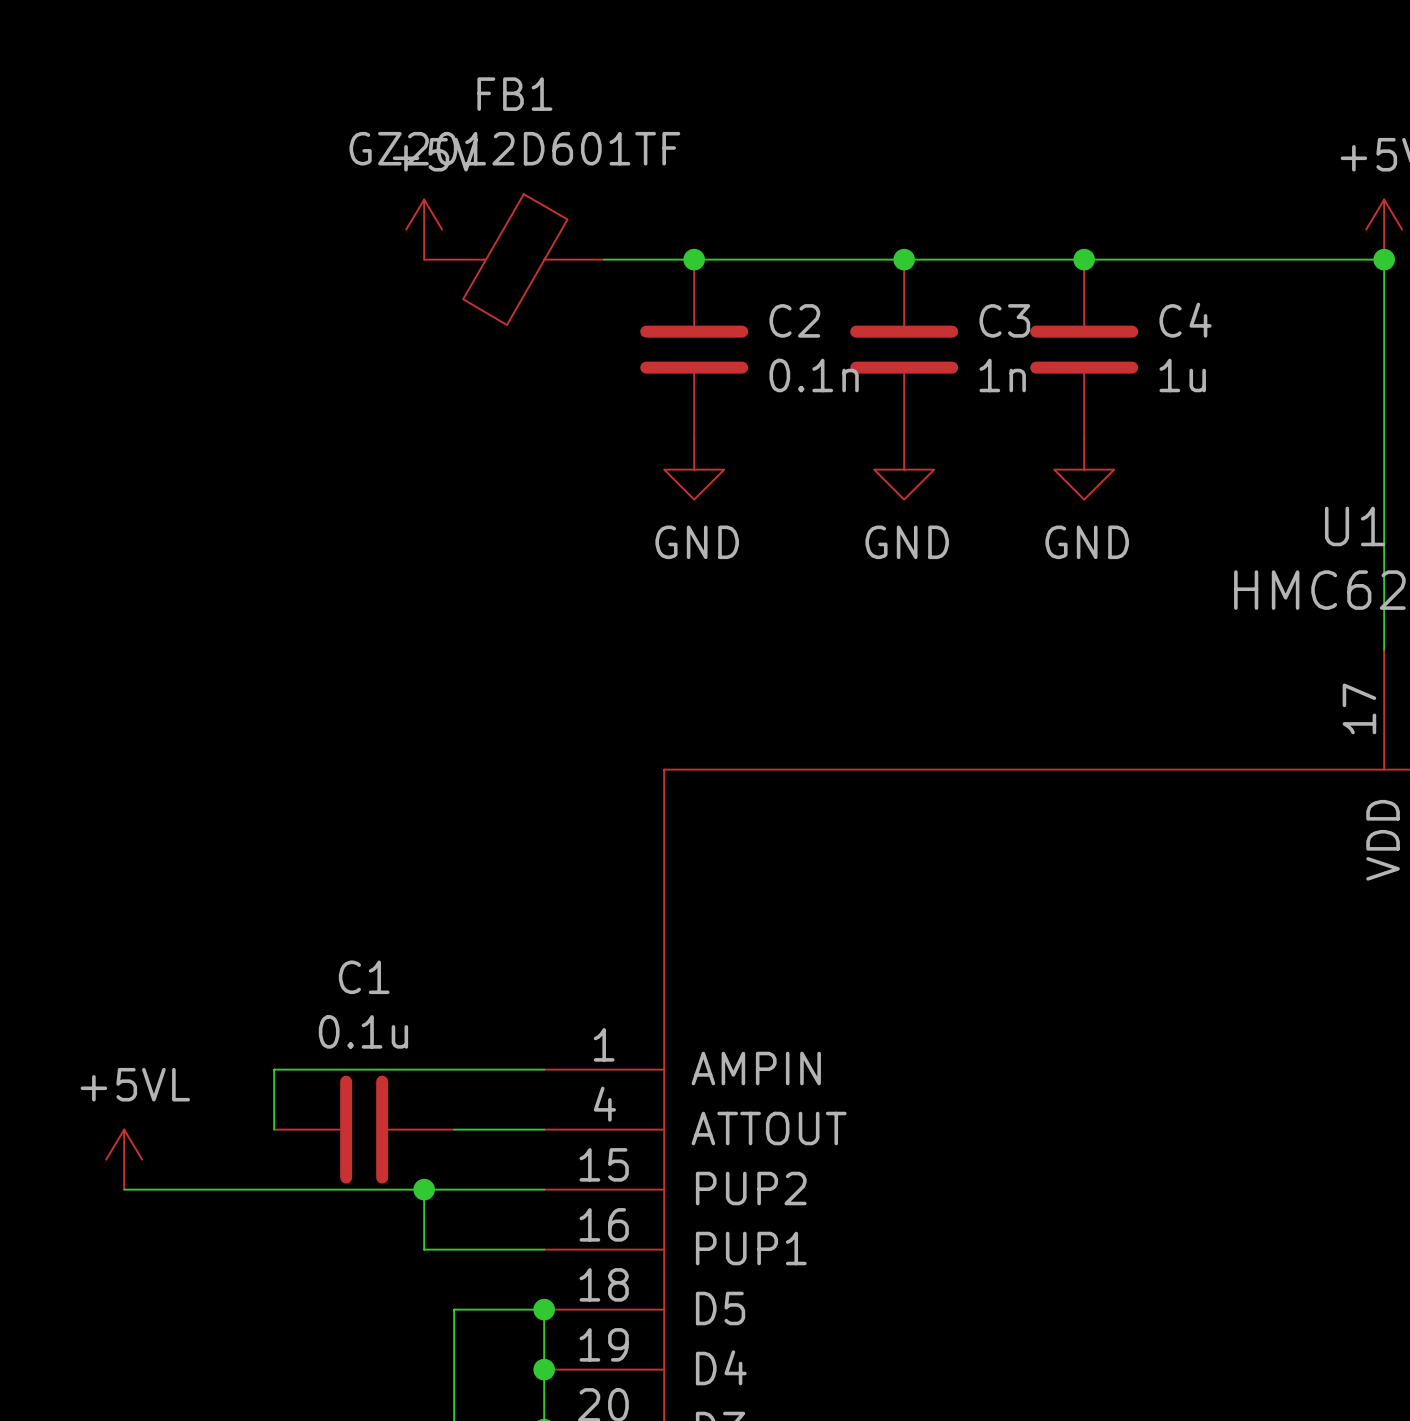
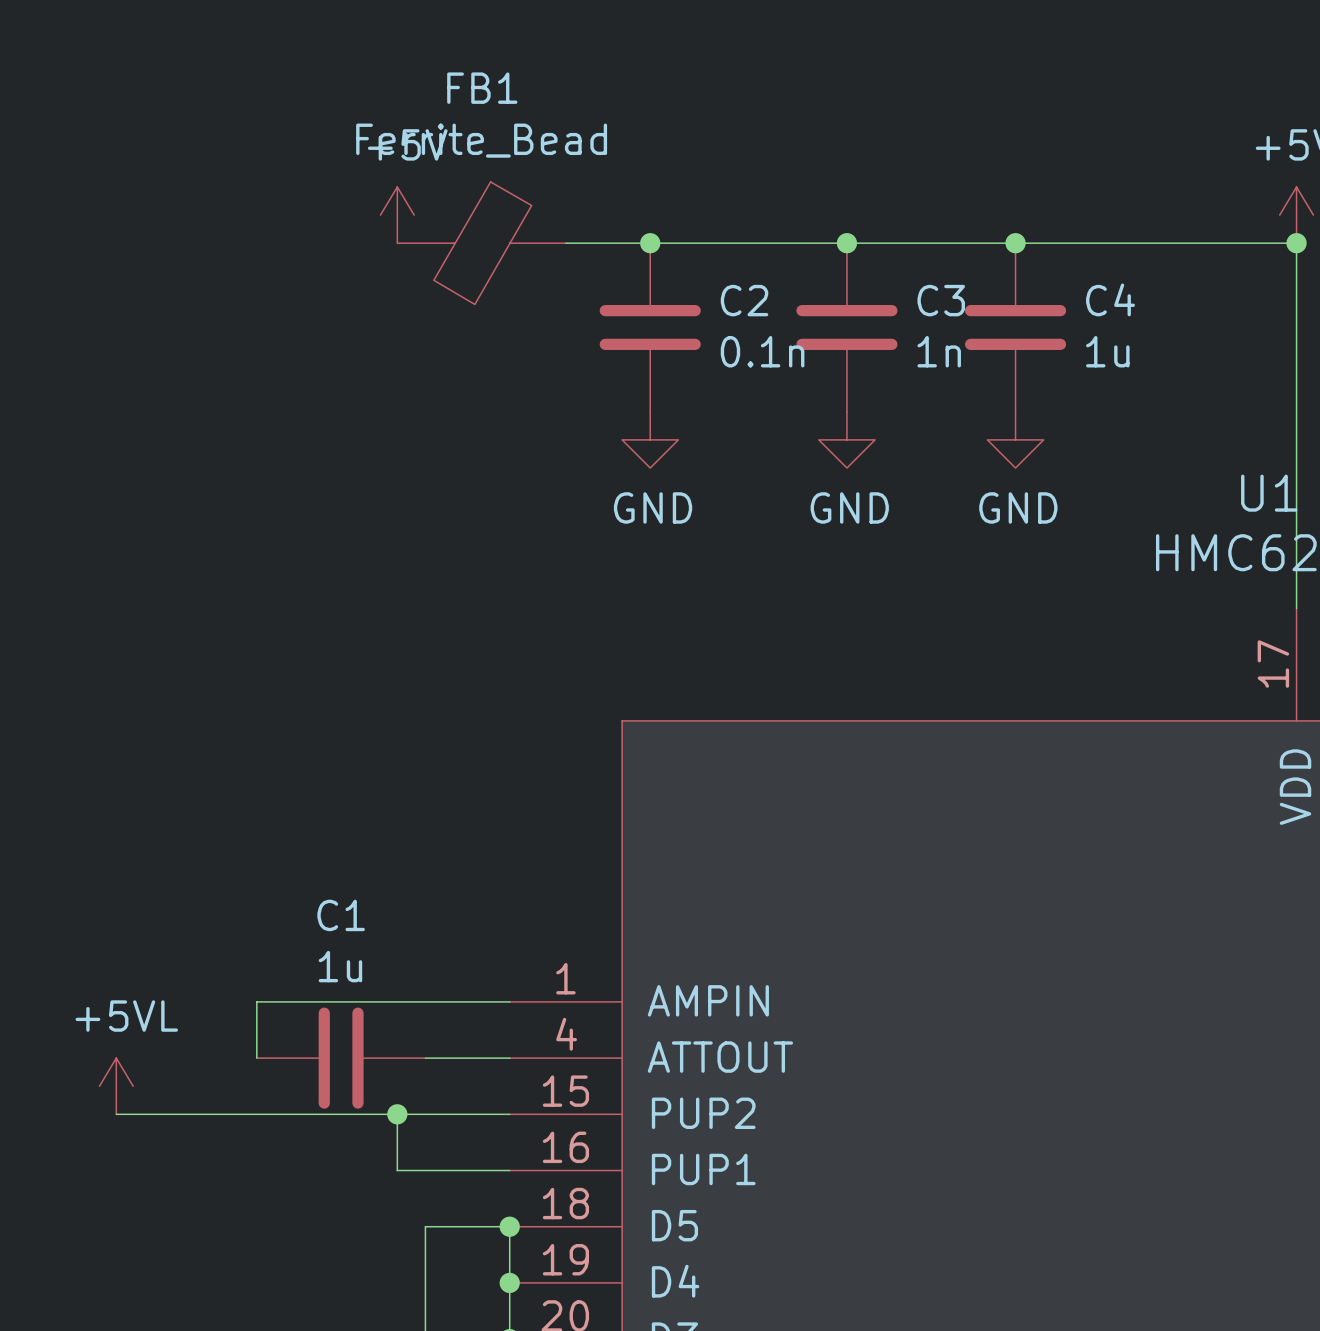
FB1 value: GZ2012D601TF (514, 148) -> Ferrite_Bead (481, 140)
C1 value: 0.1u (363, 1031) -> 1u (340, 966)

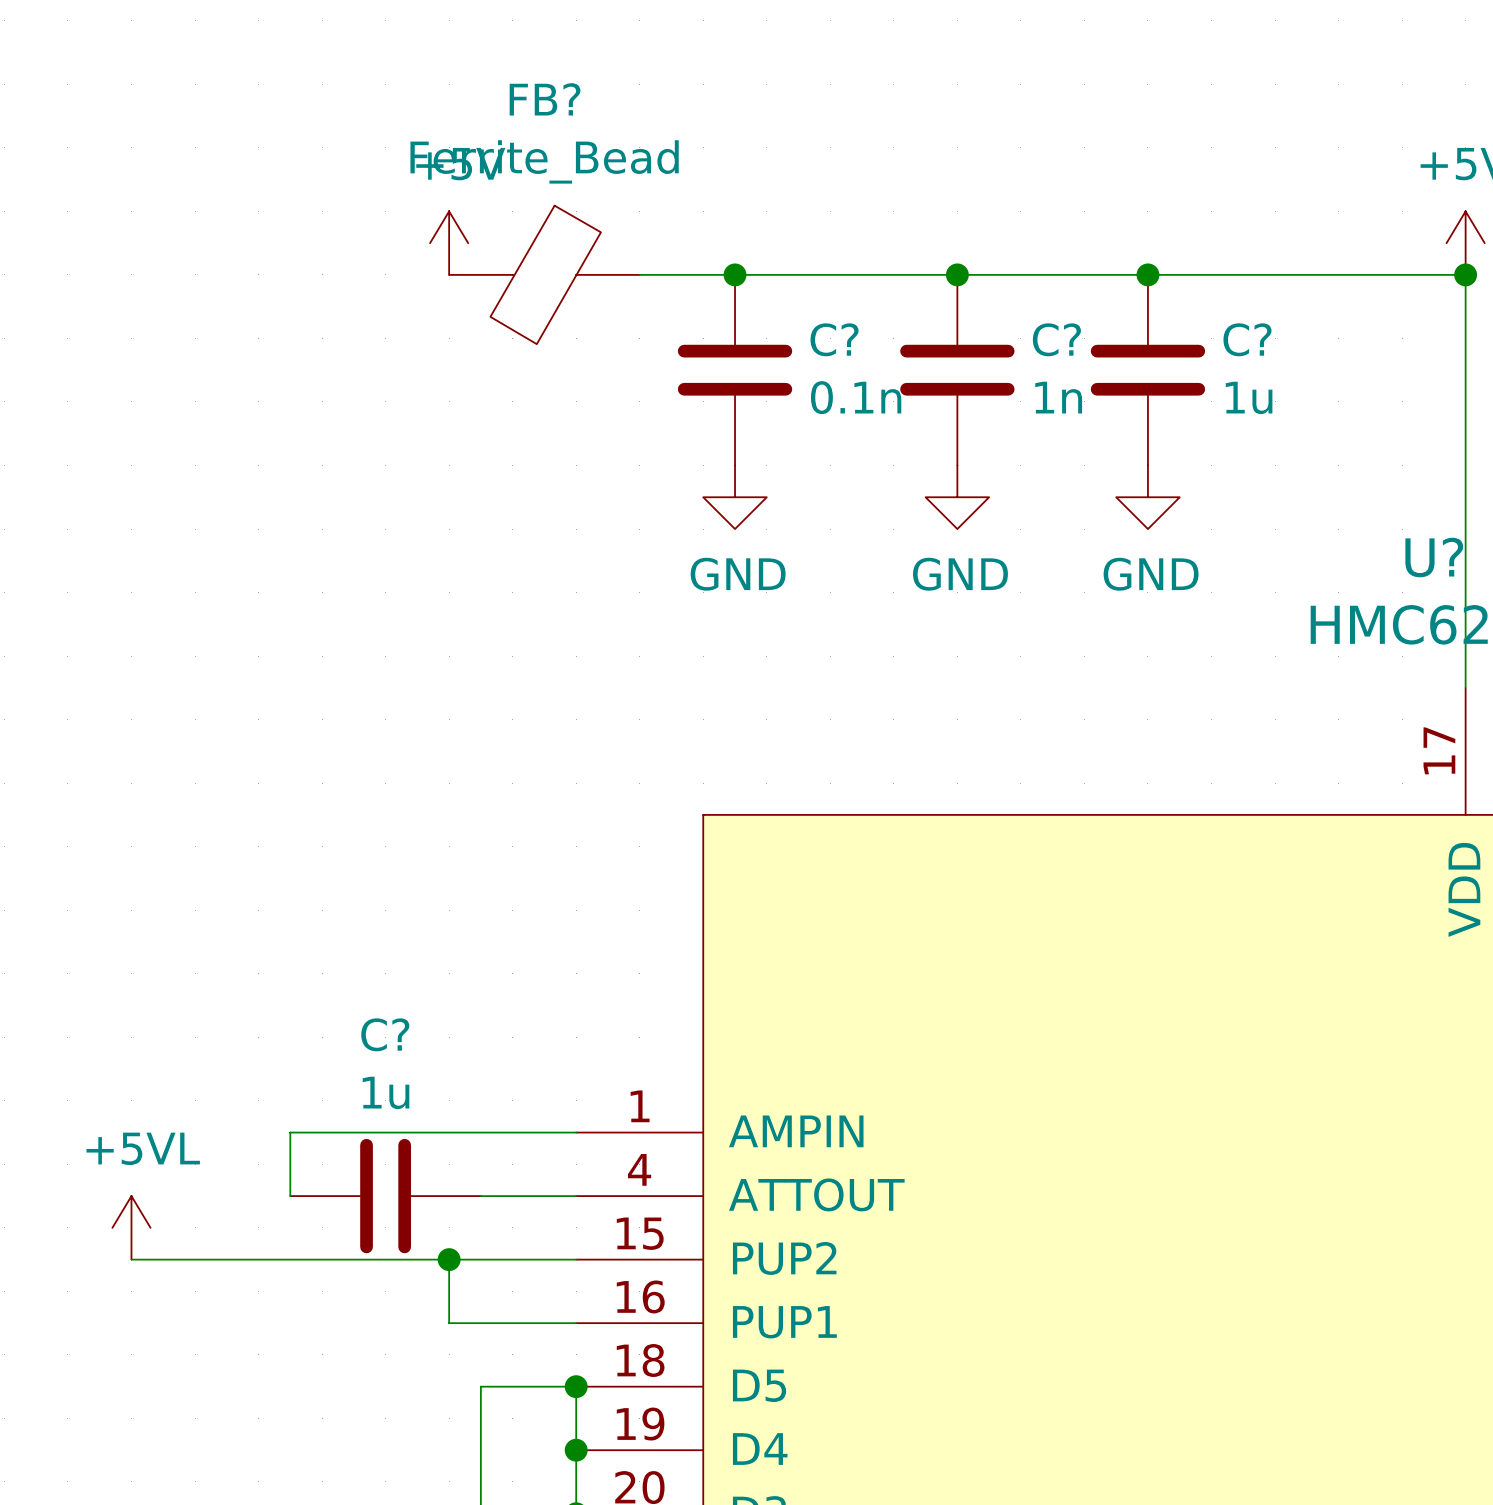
FB1 name: FB1 (482, 88) -> FB? (545, 99)
C4 name: C4 (1110, 299) -> C? (1247, 339)
C2 name: C2 (744, 300) -> C? (834, 339)
C3 name: C3 (941, 300) -> C? (1056, 339)
U1 name: U1 (1269, 493) -> U? (1434, 557)
C1 name: C1 (341, 915) -> C? (385, 1034)

